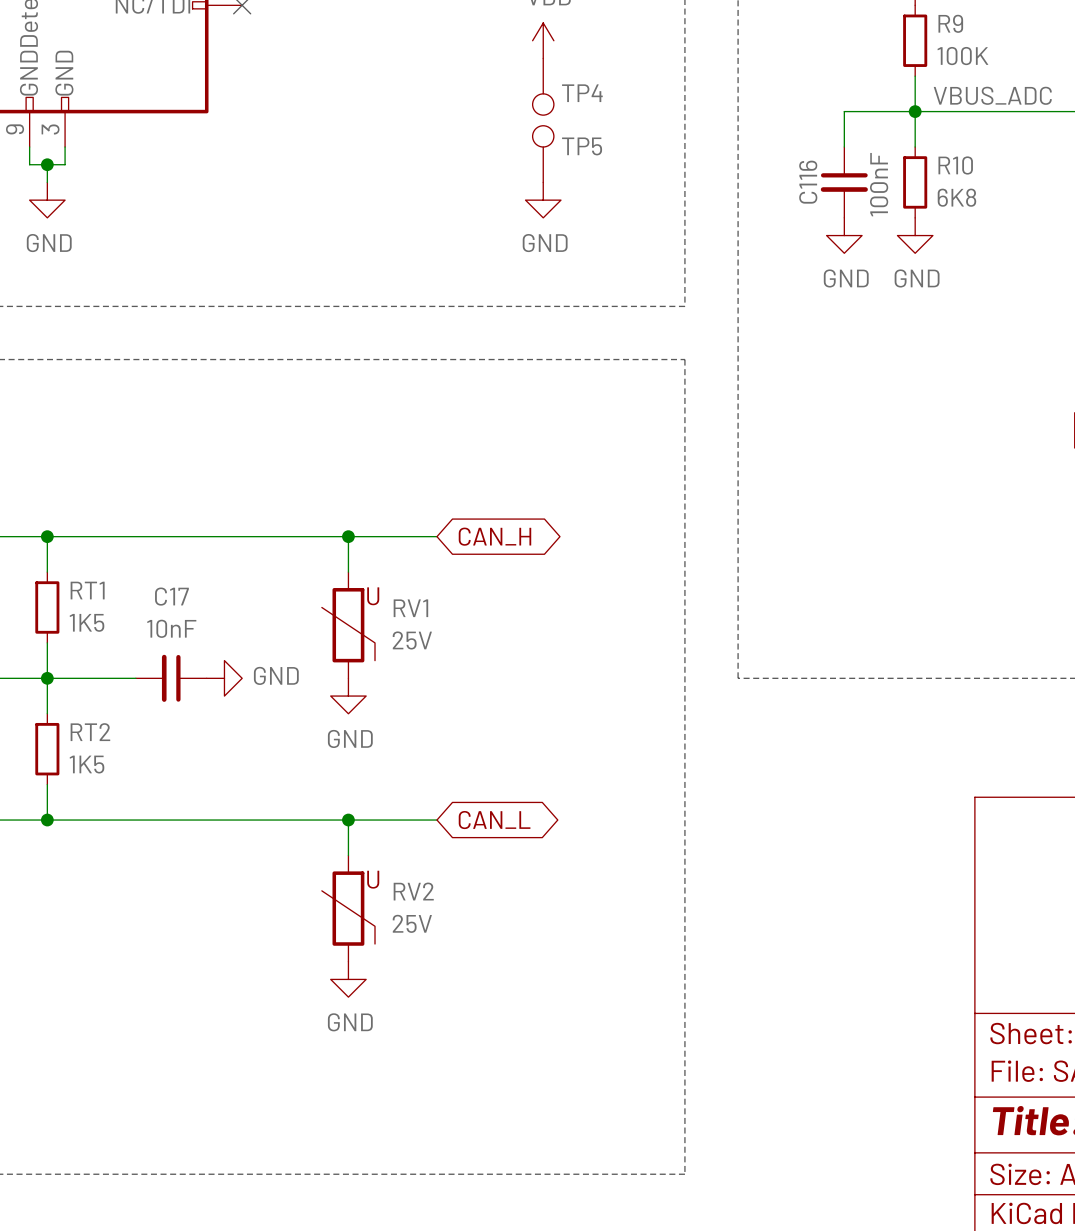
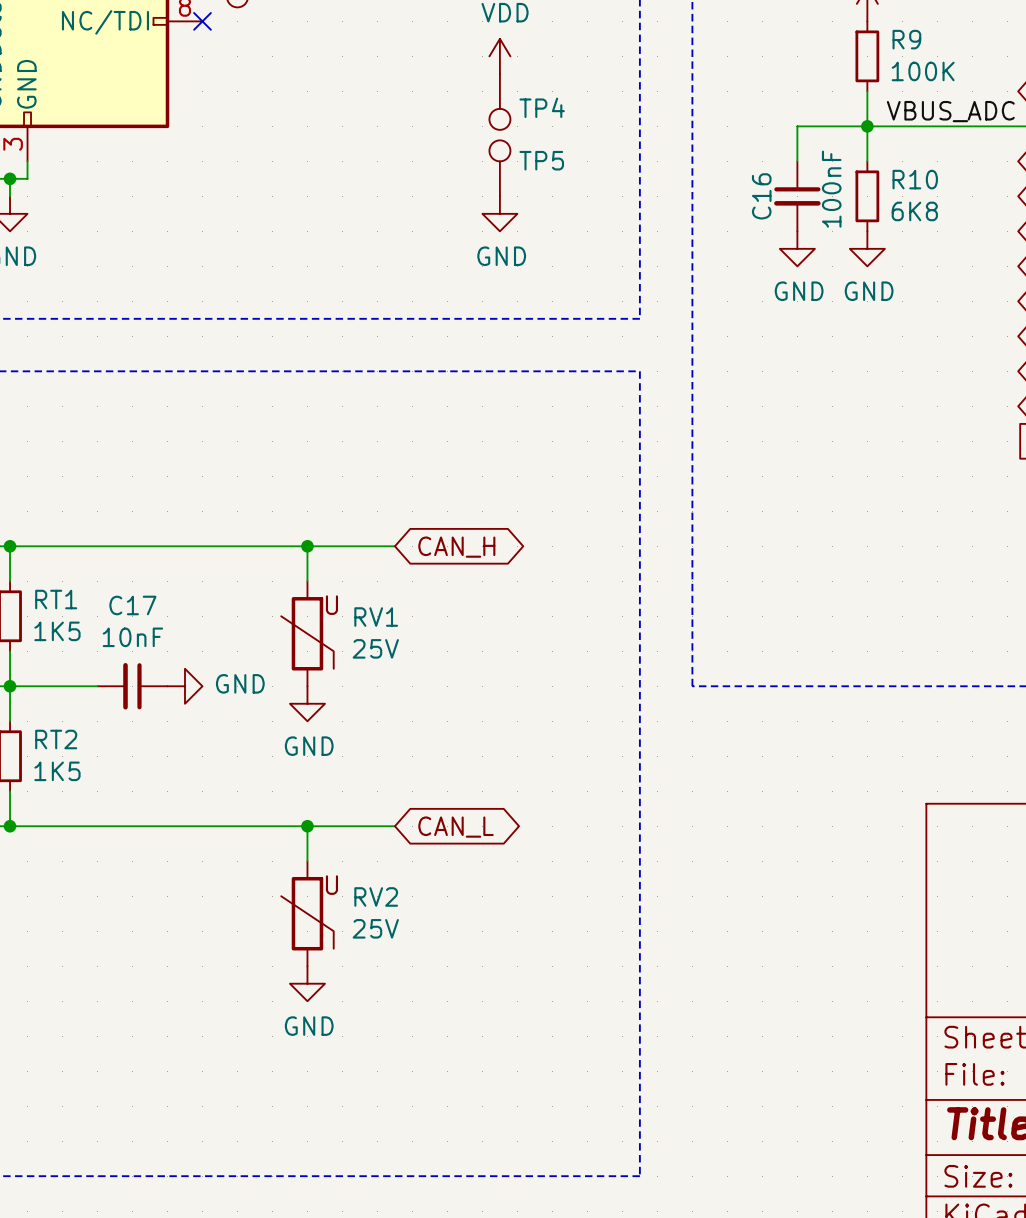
C116 name: C116 (808, 182) -> C16 (761, 196)

